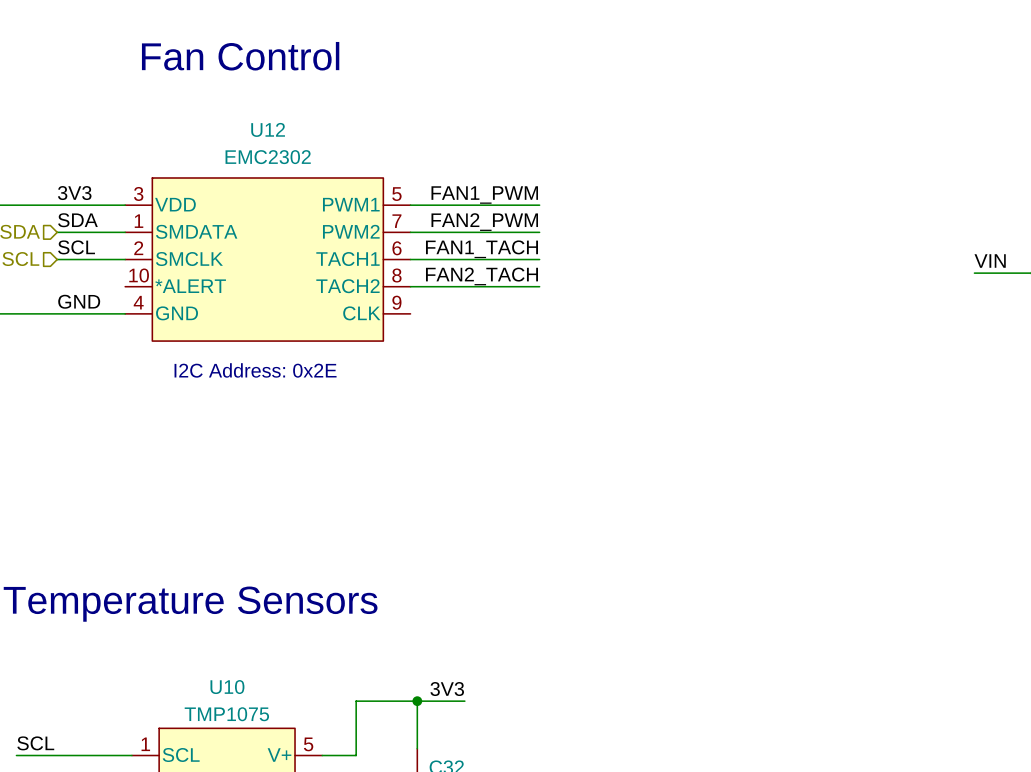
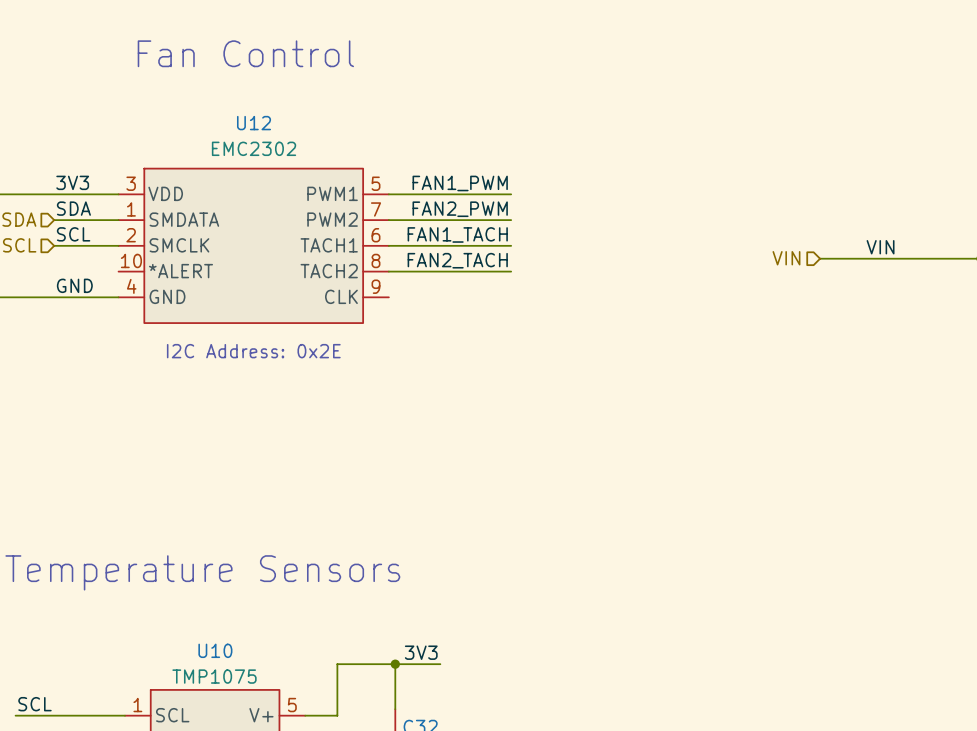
label position: VIN (990, 260) -> VIN (880, 247)
hierarchical label: none -> VIN (786, 258)
wire: none -> (820, 258) (923, 258)

